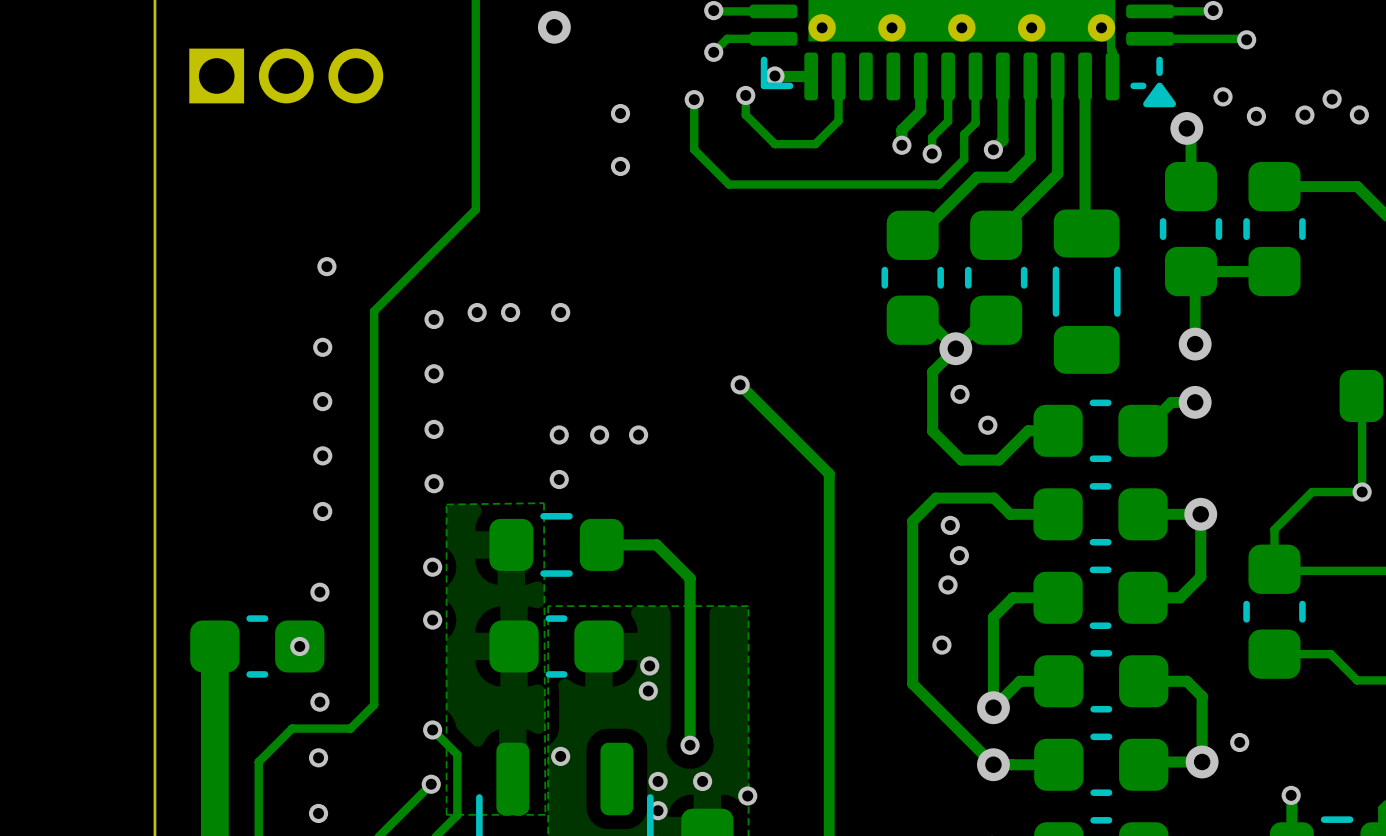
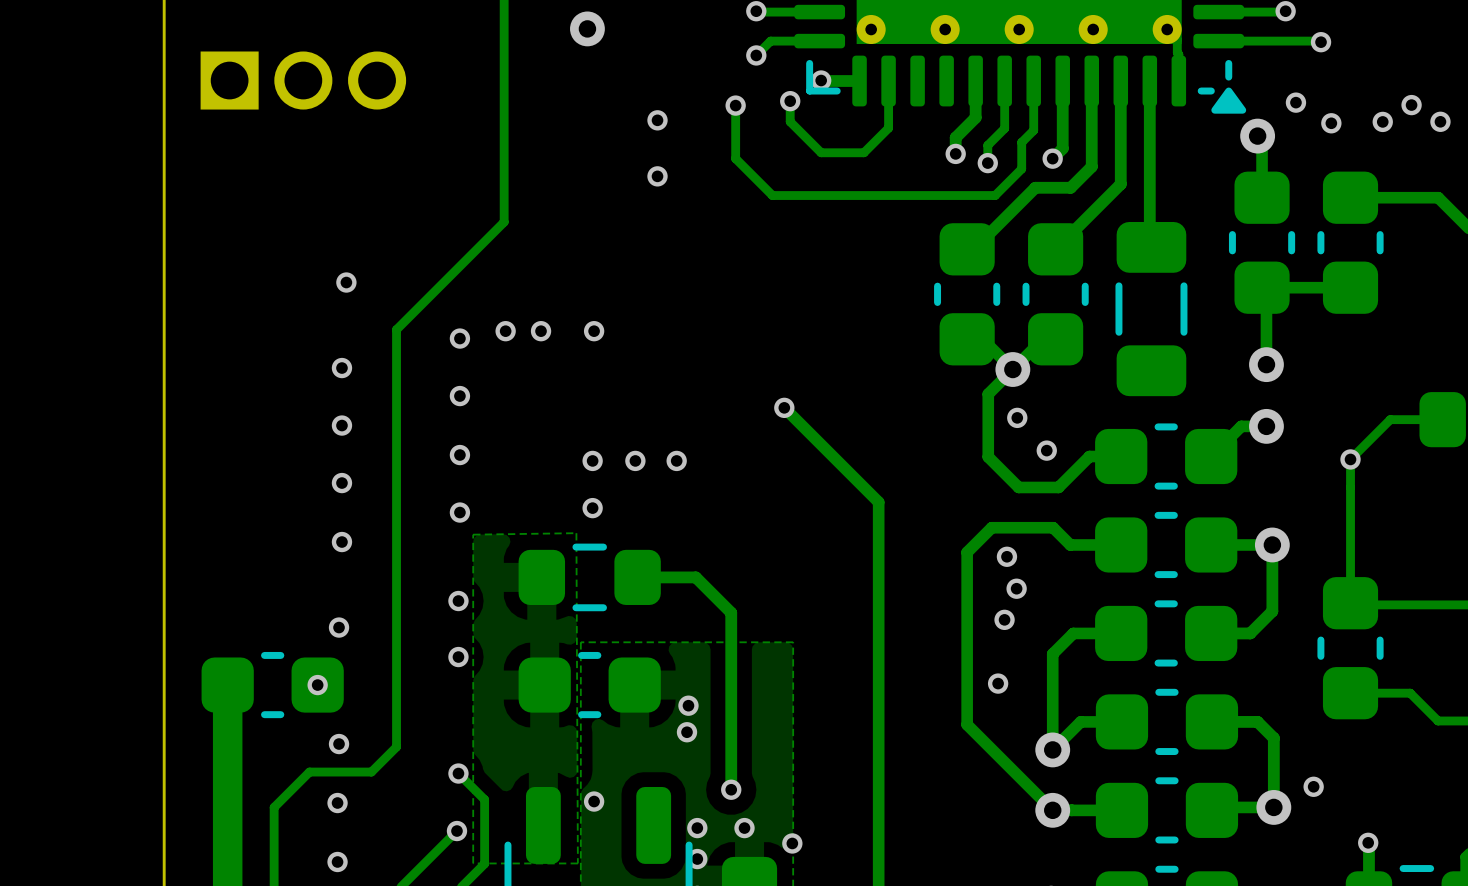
track: (1362, 396) (1362, 492) (1312, 492) (1274, 529) -> (1442, 419) (1390, 419) (1350, 459) (1350, 561)
via position: (1362, 492) -> (1350, 459)

